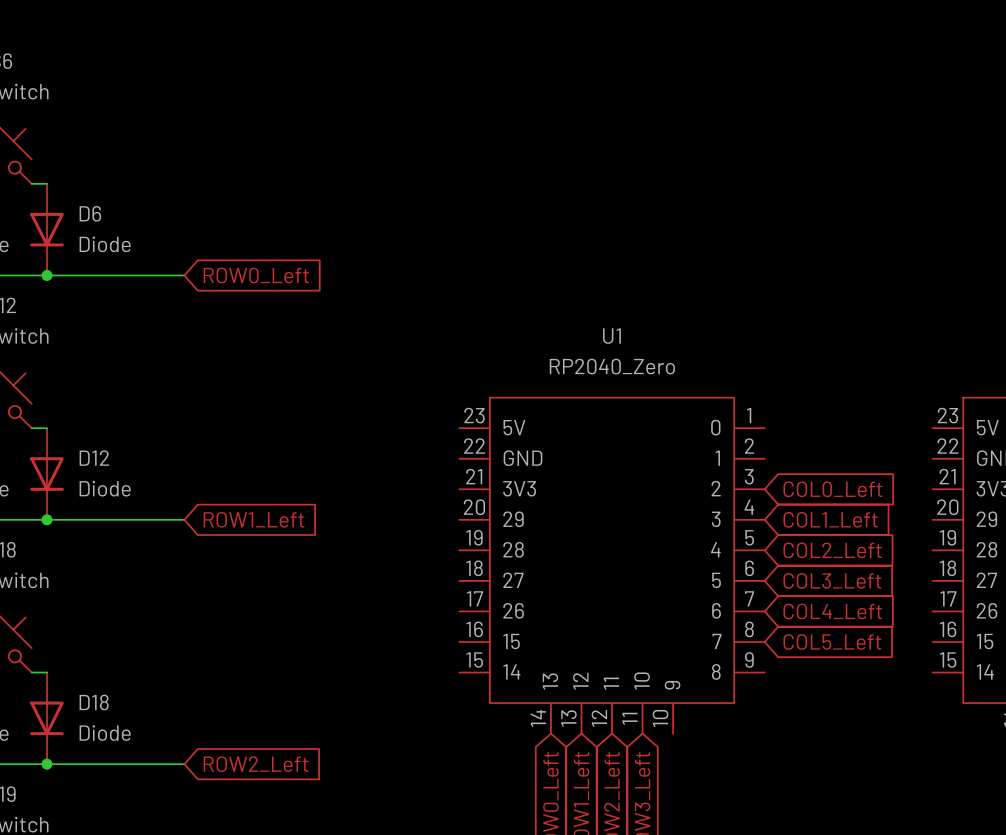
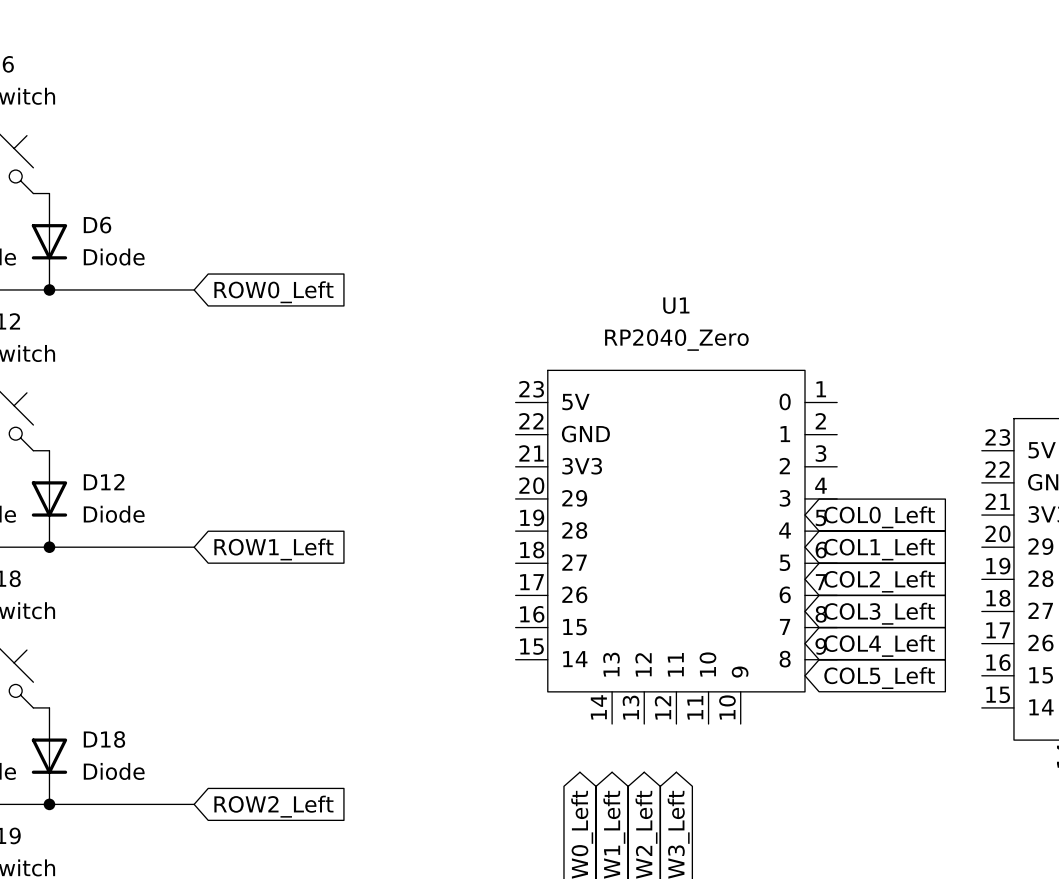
U1 position: (612, 565) -> (676, 547)

